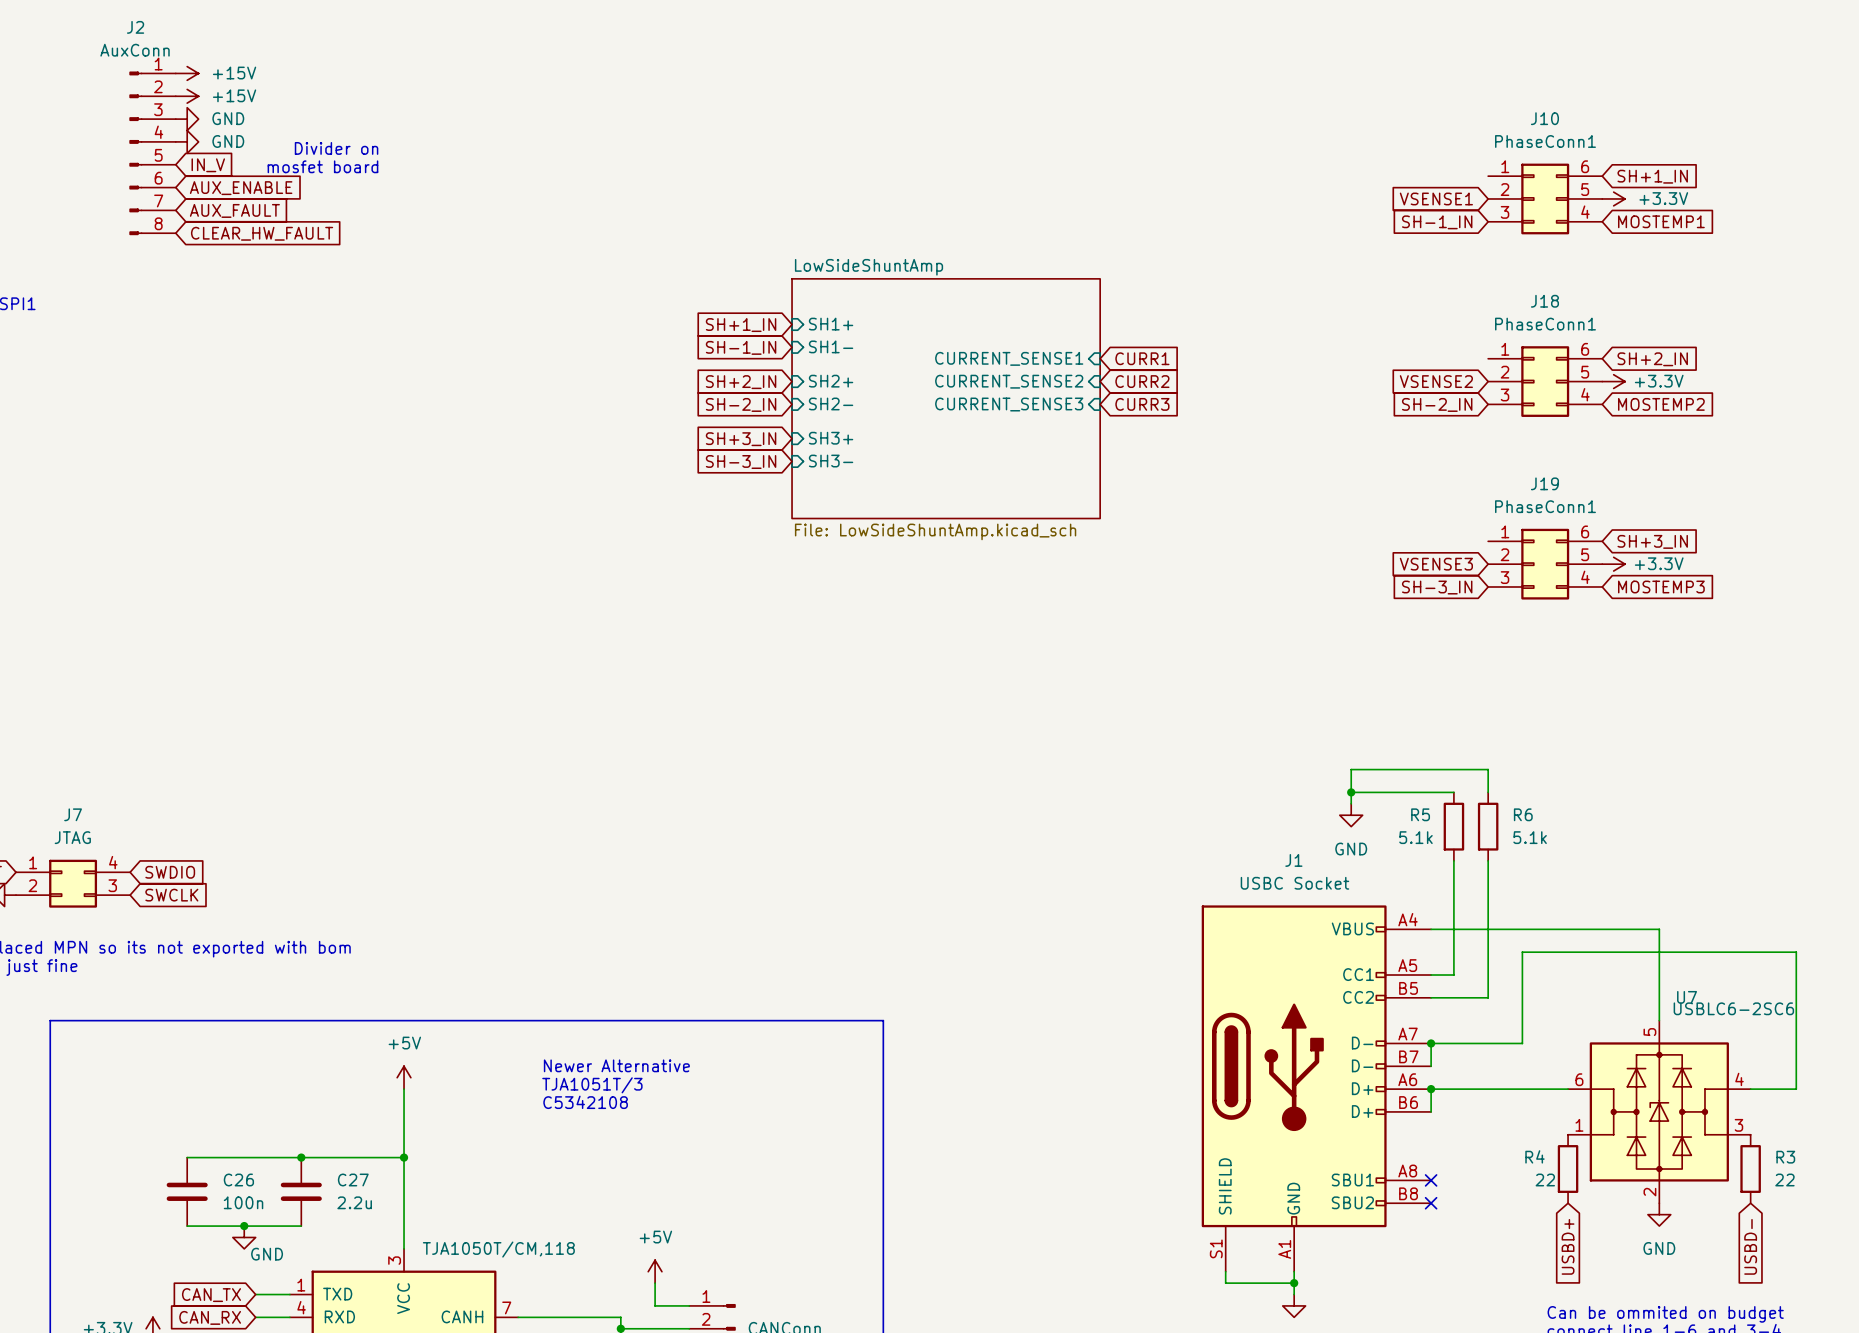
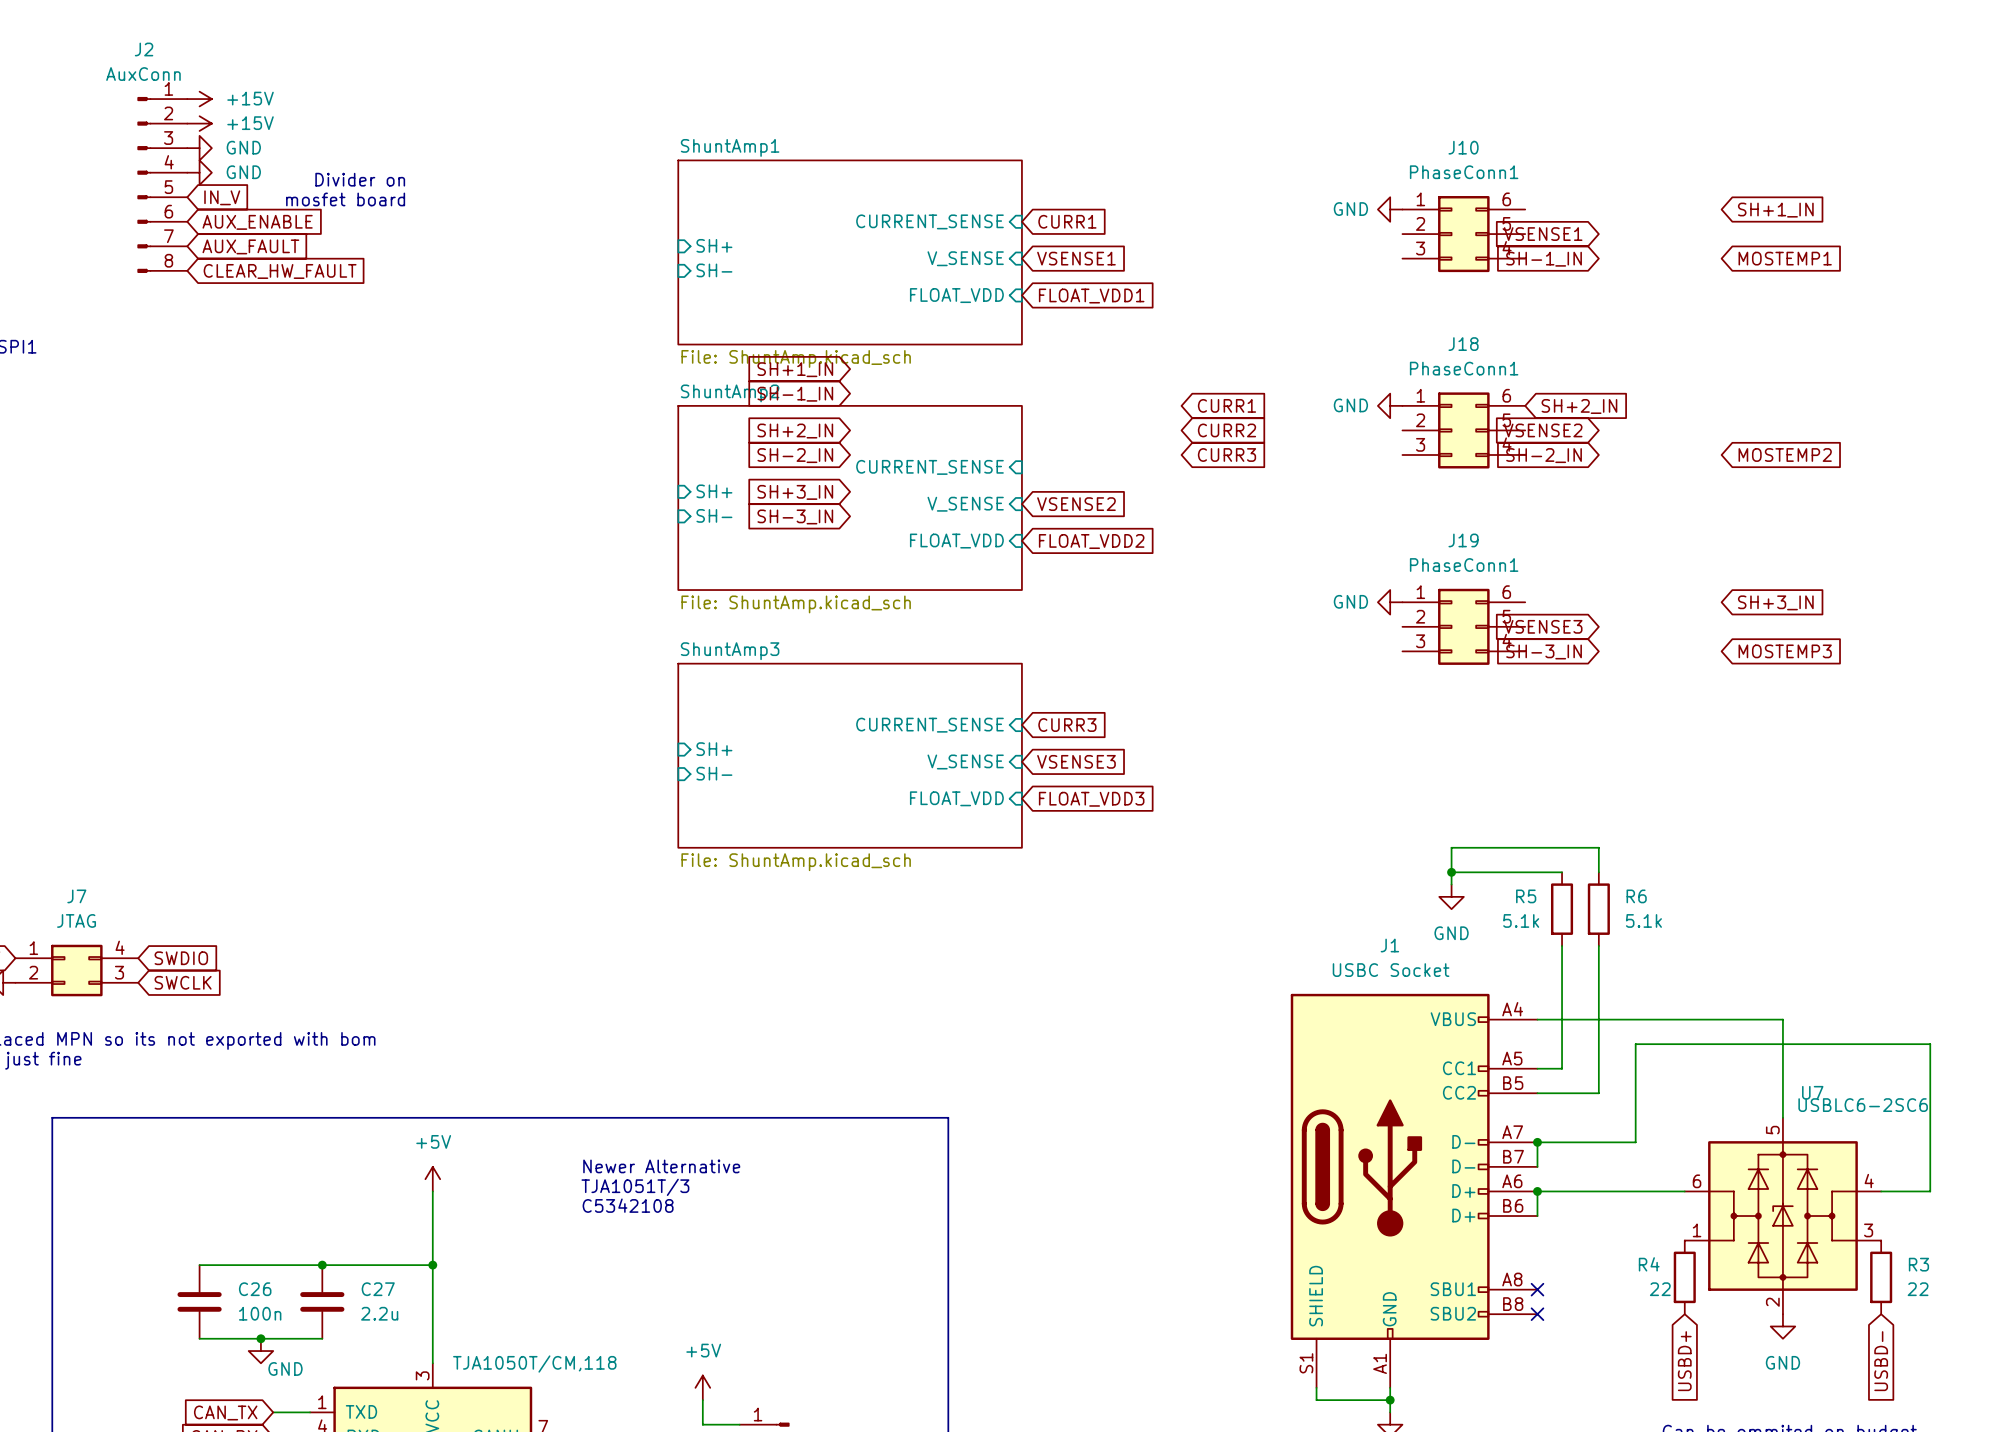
power symbol: none -> GND (1390, 209)
sheet pin: none -> CURRENT_SENSE (930, 221)
global label: none -> CURR1 (1067, 221)
J10 position: (1545, 198) -> (1463, 234)
power symbol: +3.3V (1613, 198) -> none
sheet pin: none -> SH+ (714, 245)
sheet ShuntAmp1: none -> File: ShuntAmp.kicad_sch (850, 252)
sheet pin: none -> V_SENSE (965, 258)
global label: none -> VSENSE1 (1076, 258)
sheet pin: none -> SH- (714, 270)
sheet pin: none -> FLOAT_VDD (956, 295)
global label: none -> FLOAT_VDD1 (1091, 296)
sheet pin: SH1+ (831, 324) -> none
sheet pin: SH1- (831, 346) -> none
sheet pin: CURRENT_SENSE1 (1009, 358) -> none
power symbol: none -> GND (1390, 405)
global label position: SH+2_IN (1652, 359) -> SH+2_IN (1579, 406)
sheet pin: SH2+ (831, 381) -> none
sheet pin: CURRENT_SENSE2 (1009, 381) -> none
J18 position: (1545, 381) -> (1463, 430)
power symbol: +3.3V (1613, 381) -> none
sheet LowSideShuntAmp: File: LowSideShuntAmp.kicad_sch (946, 398) -> none
sheet pin: SH2- (831, 403) -> none
sheet pin: CURRENT_SENSE3 (1009, 404) -> CURRENT_SENSE (930, 467)
sheet pin: none -> SH+ (714, 491)
sheet pin: SH3+ (831, 438) -> none
sheet ShuntAmp2: none -> File: ShuntAmp.kicad_sch (850, 497)
sheet pin: none -> V_SENSE (965, 504)
global label: none -> VSENSE2 (1076, 504)
sheet pin: none -> SH- (714, 515)
sheet pin: SH3- (831, 461) -> none
sheet pin: none -> FLOAT_VDD (956, 541)
global label: none -> FLOAT_VDD2 (1091, 541)
power symbol: none -> GND (1390, 602)
J19 position: (1545, 564) -> (1463, 626)
power symbol: +3.3V (1613, 564) -> none
sheet pin: none -> CURRENT_SENSE (930, 725)
global label: none -> CURR3 (1067, 725)
sheet pin: none -> SH+ (714, 749)
sheet ShuntAmp3: none -> File: ShuntAmp.kicad_sch (850, 755)
sheet pin: none -> V_SENSE (965, 761)
global label: none -> VSENSE3 (1076, 761)
sheet pin: none -> SH- (714, 773)
sheet pin: none -> FLOAT_VDD (956, 798)
global label: none -> FLOAT_VDD3 (1091, 799)

